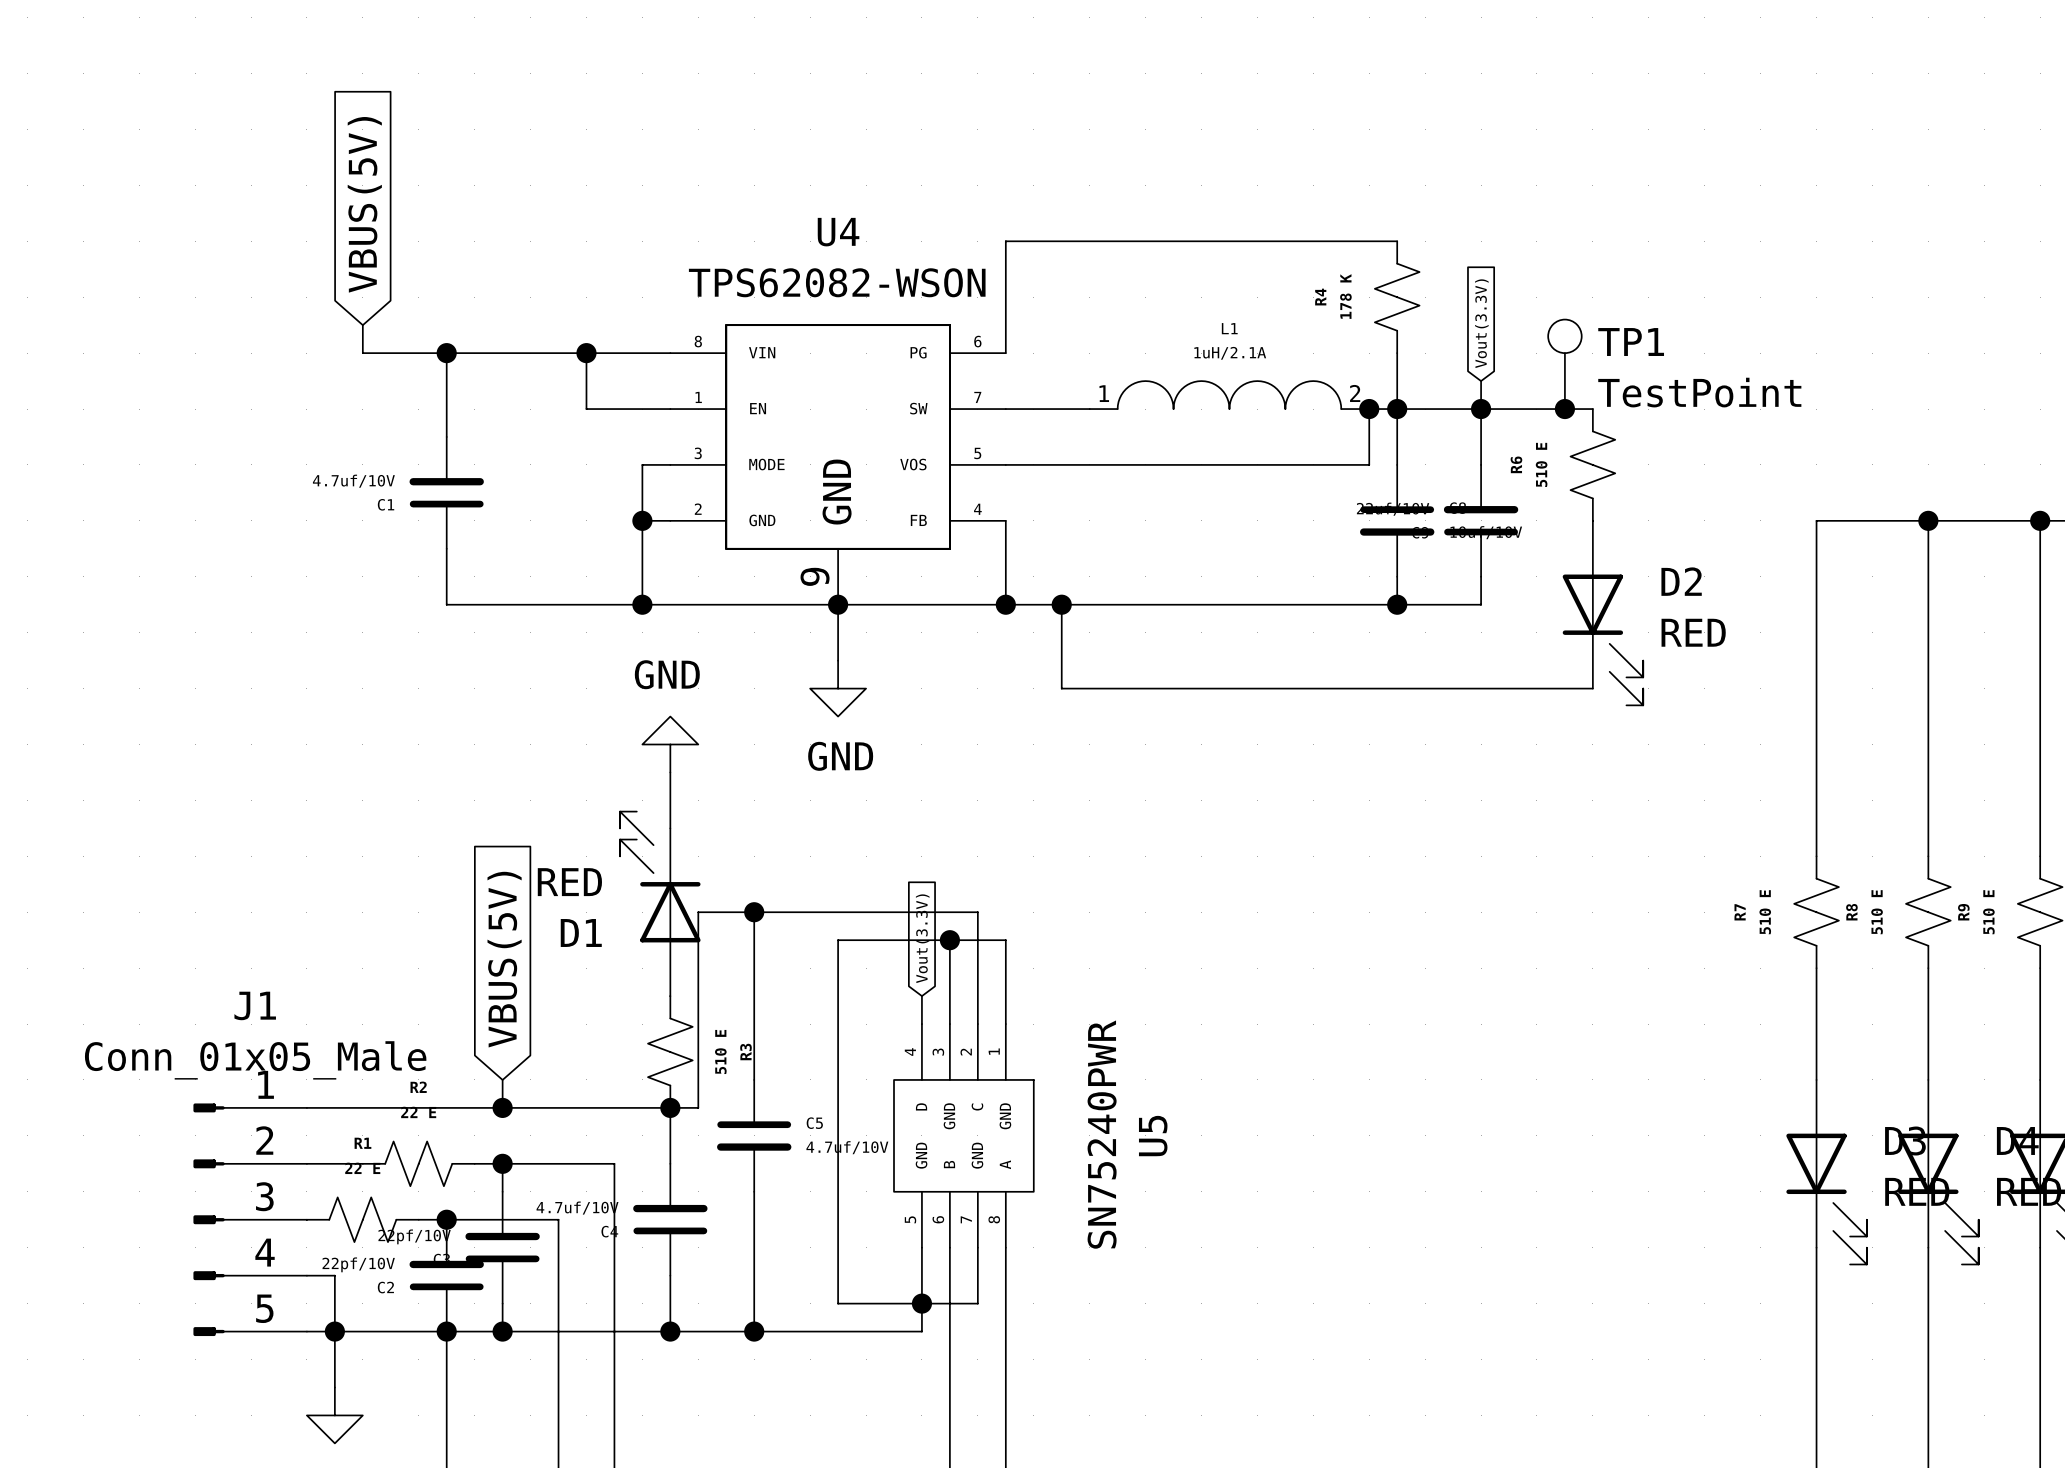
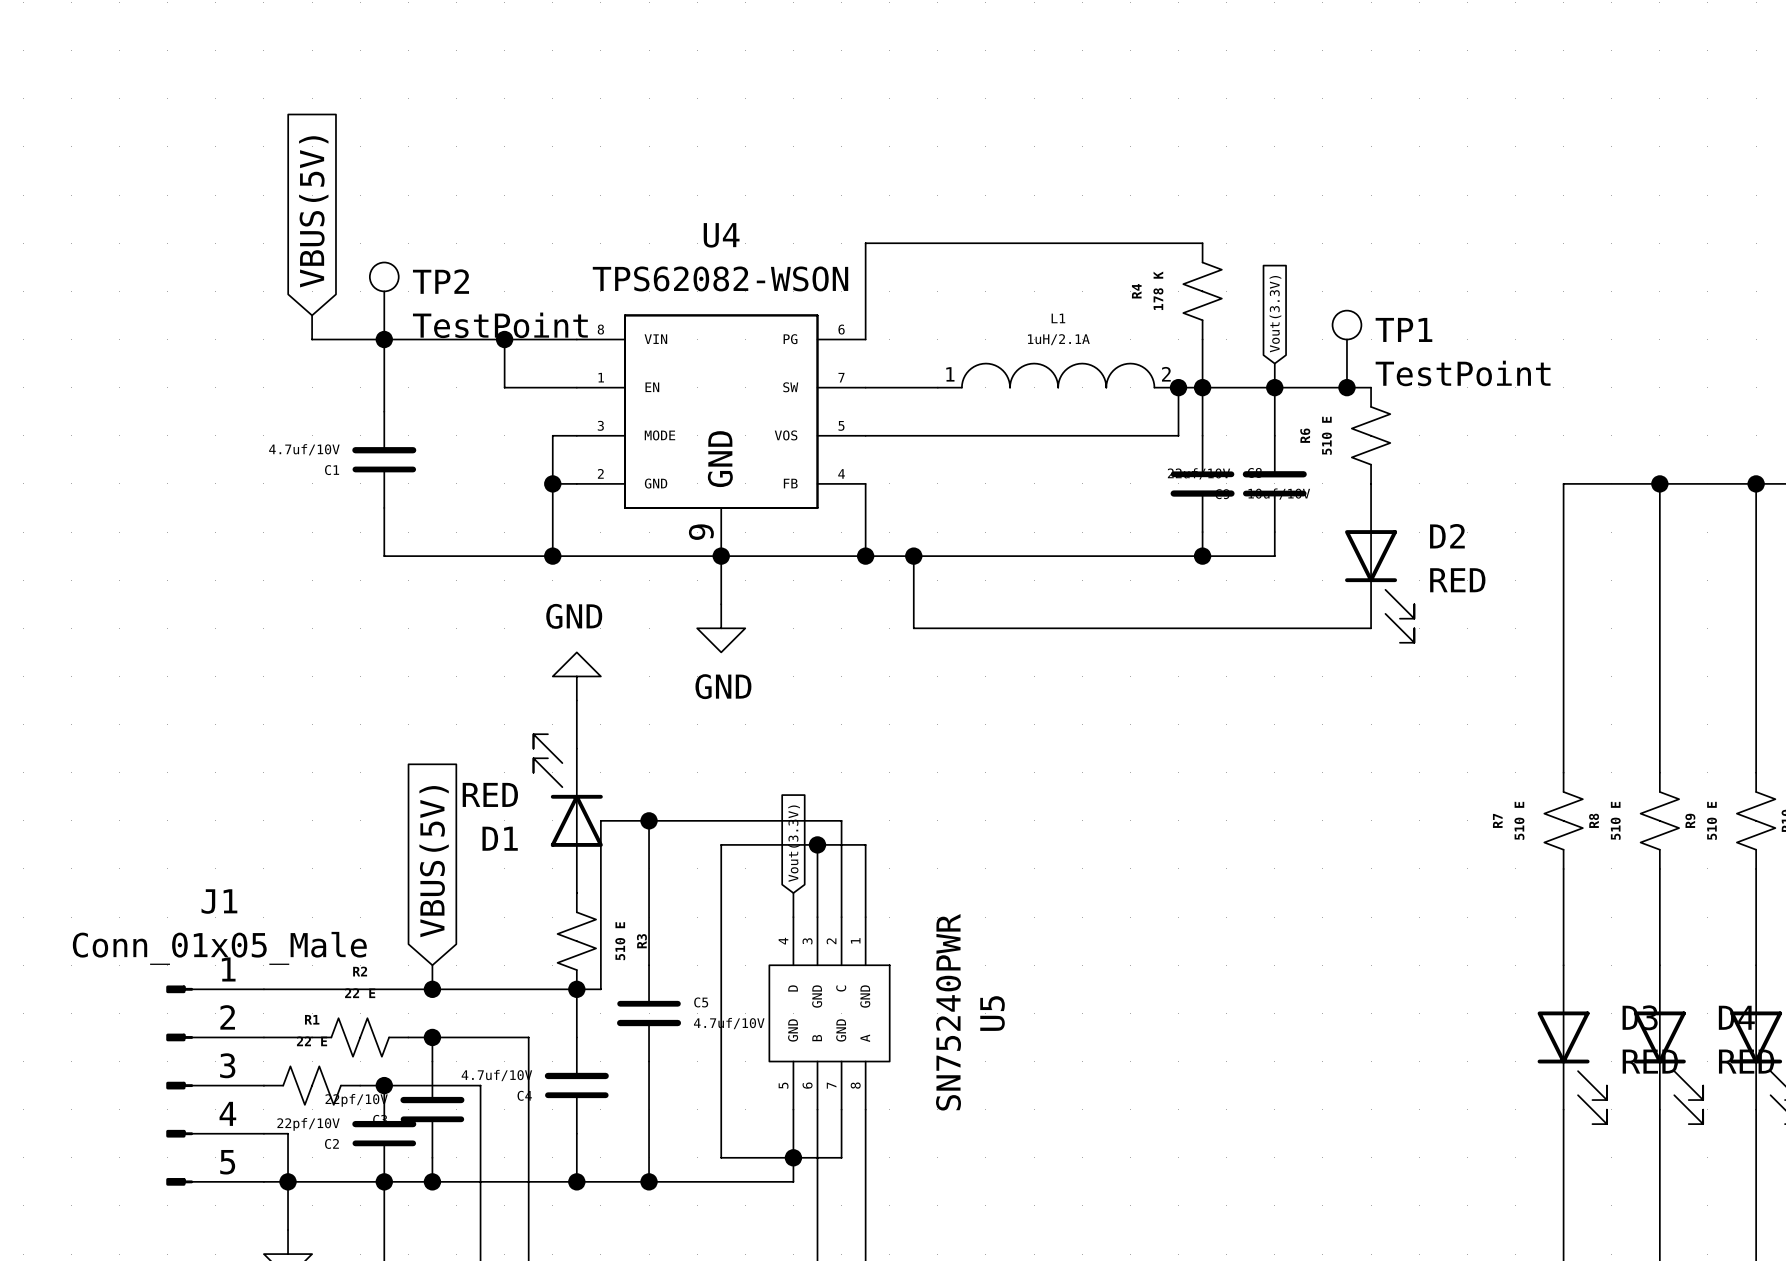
TP2: none -> TestPoint (384, 301)

